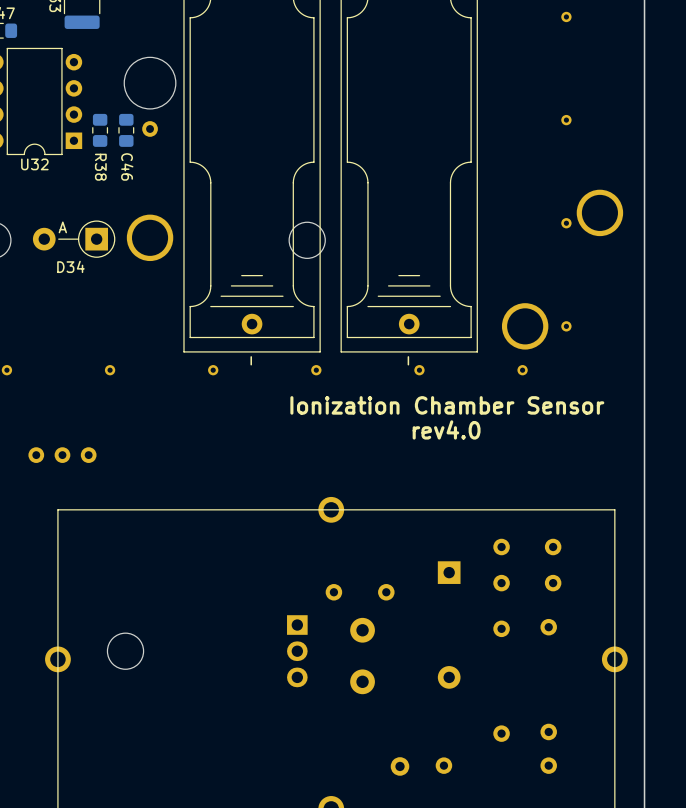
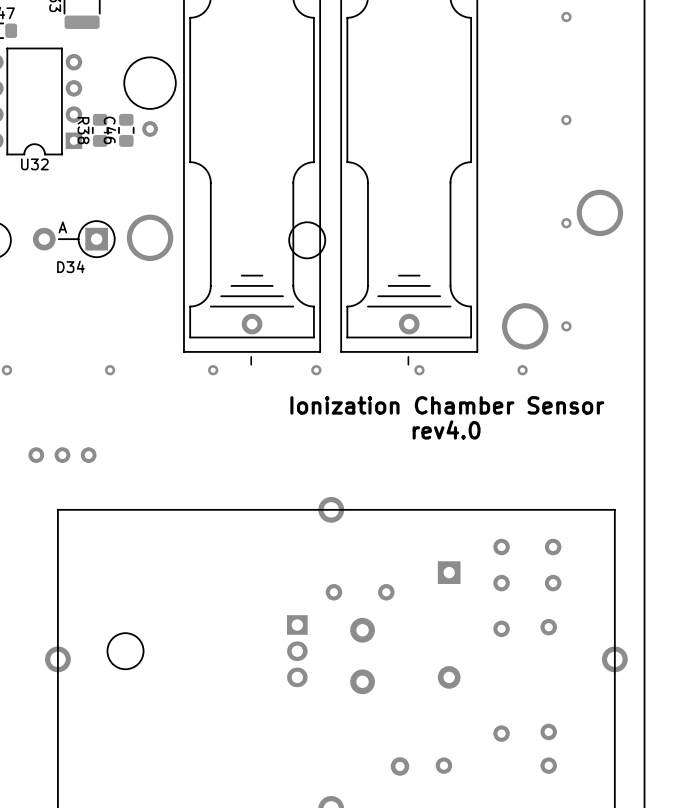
C46 name position: C46 (127, 166) -> C46 (109, 130)
R38 name position: R38 (100, 167) -> R38 (83, 130)

